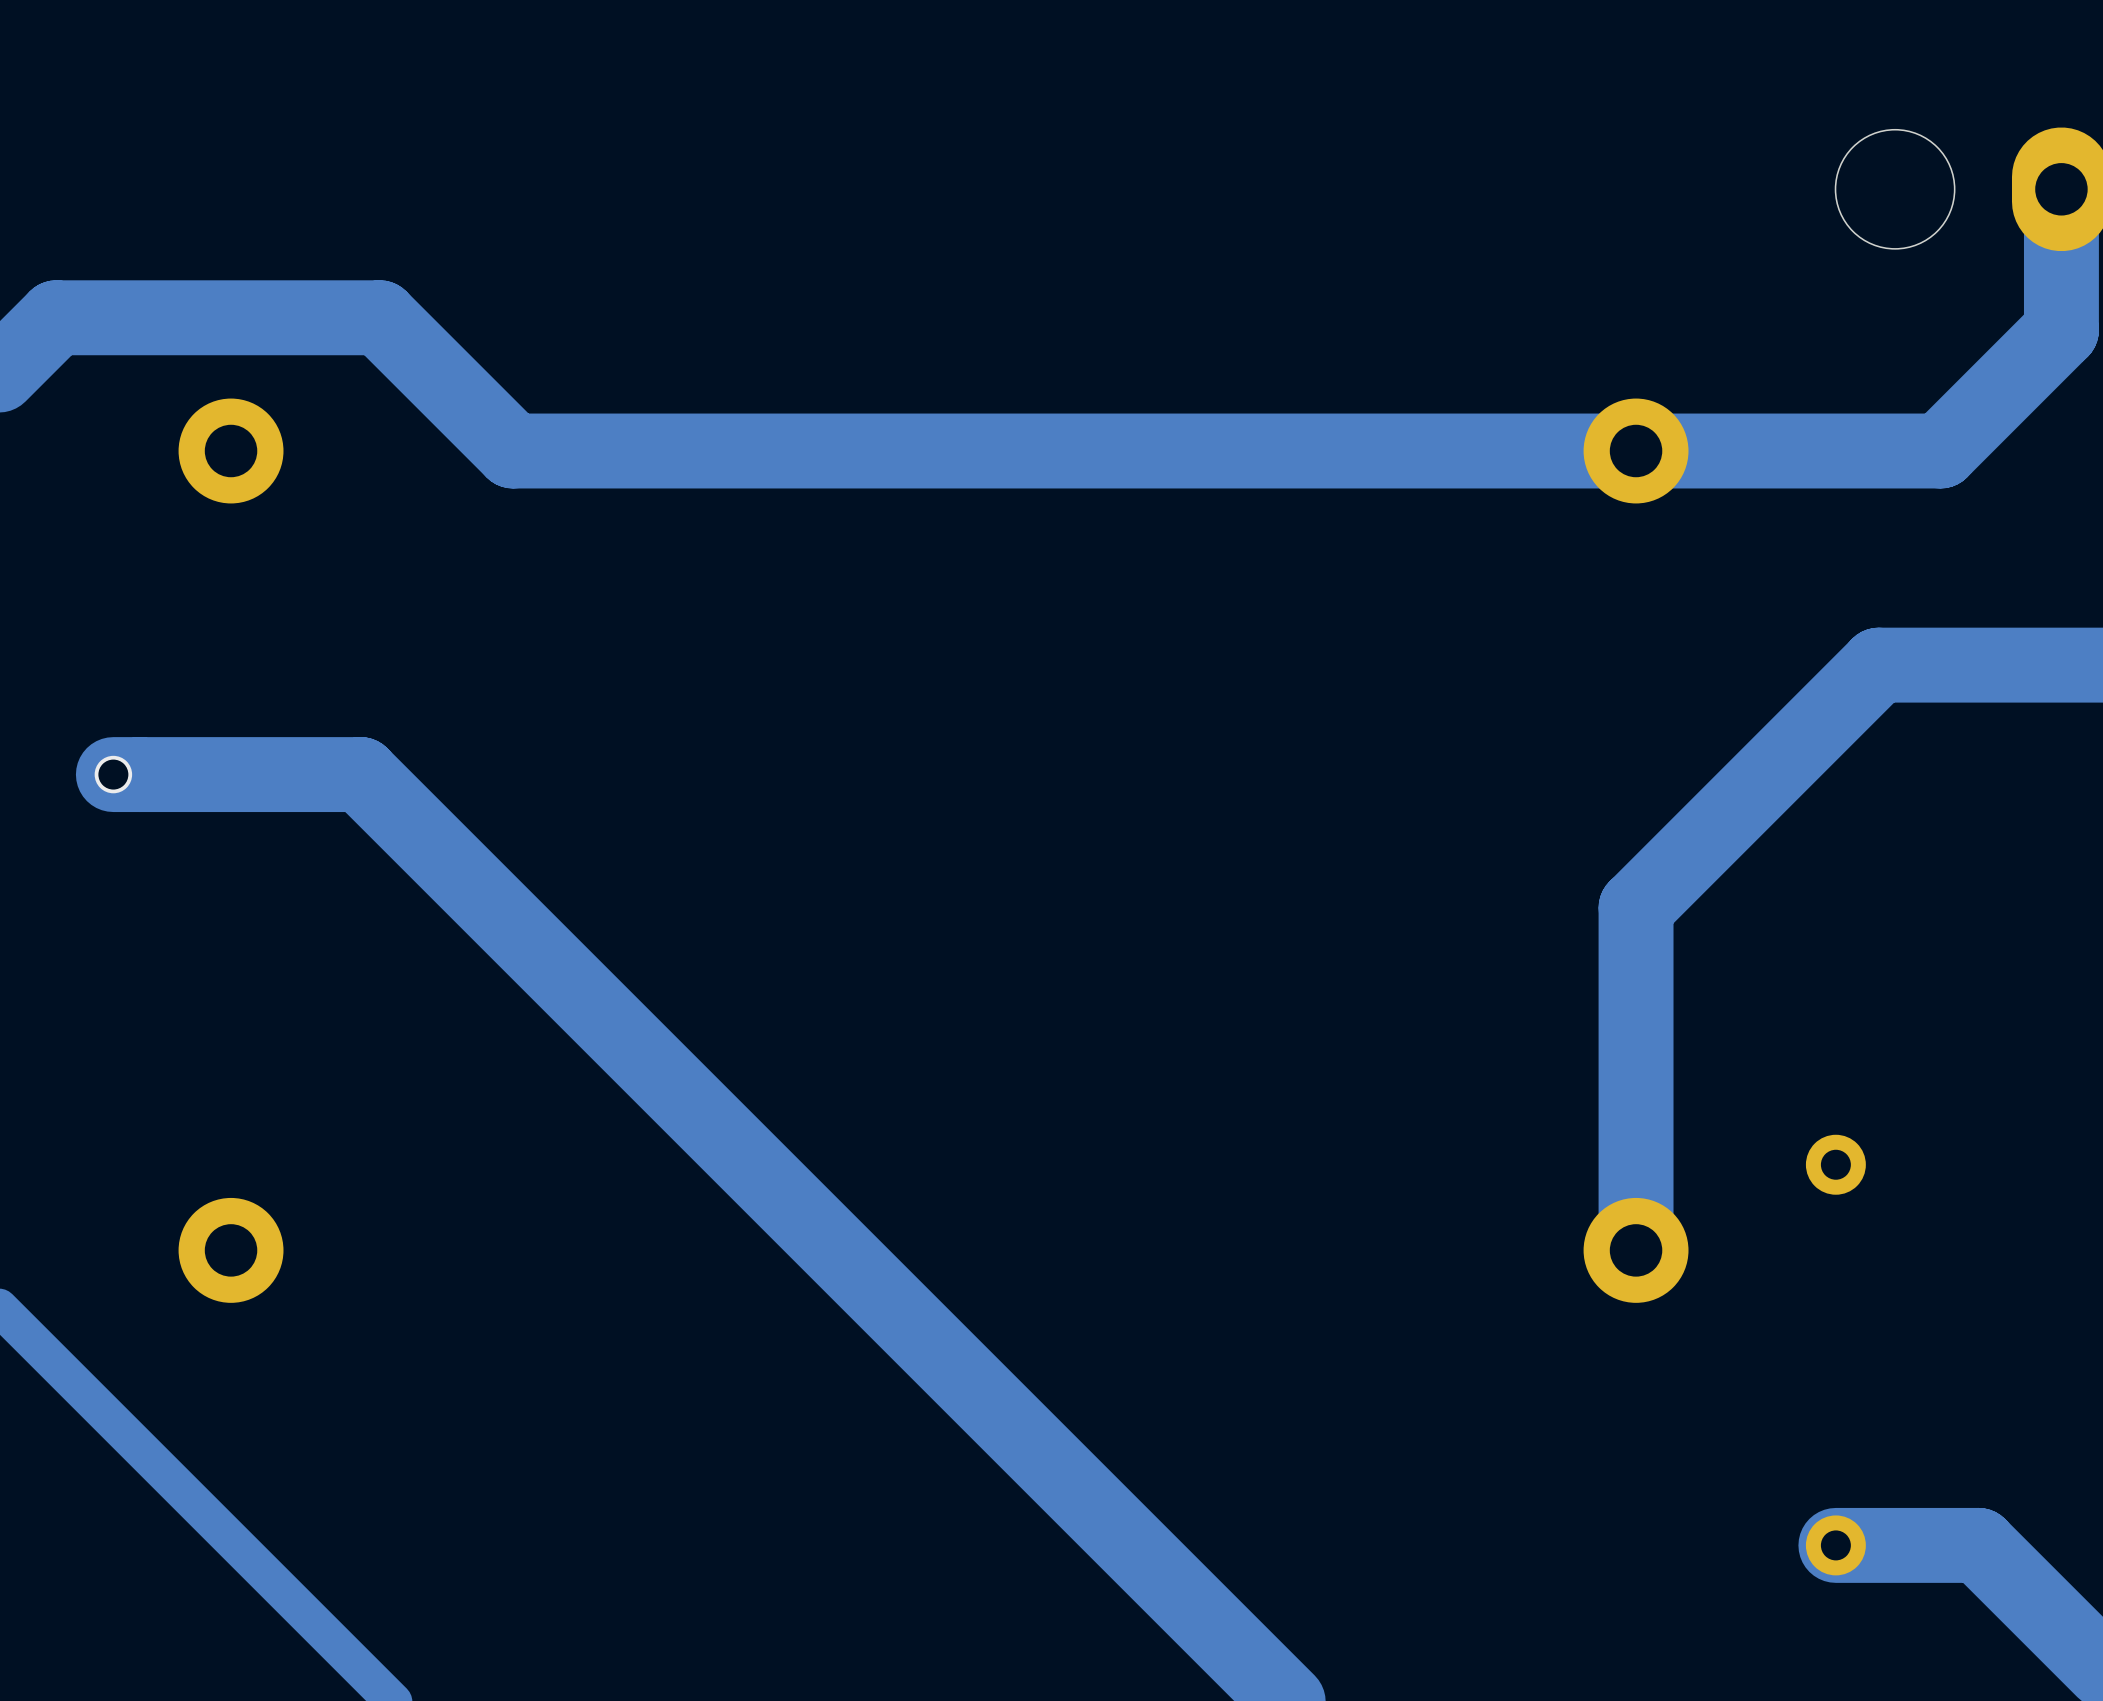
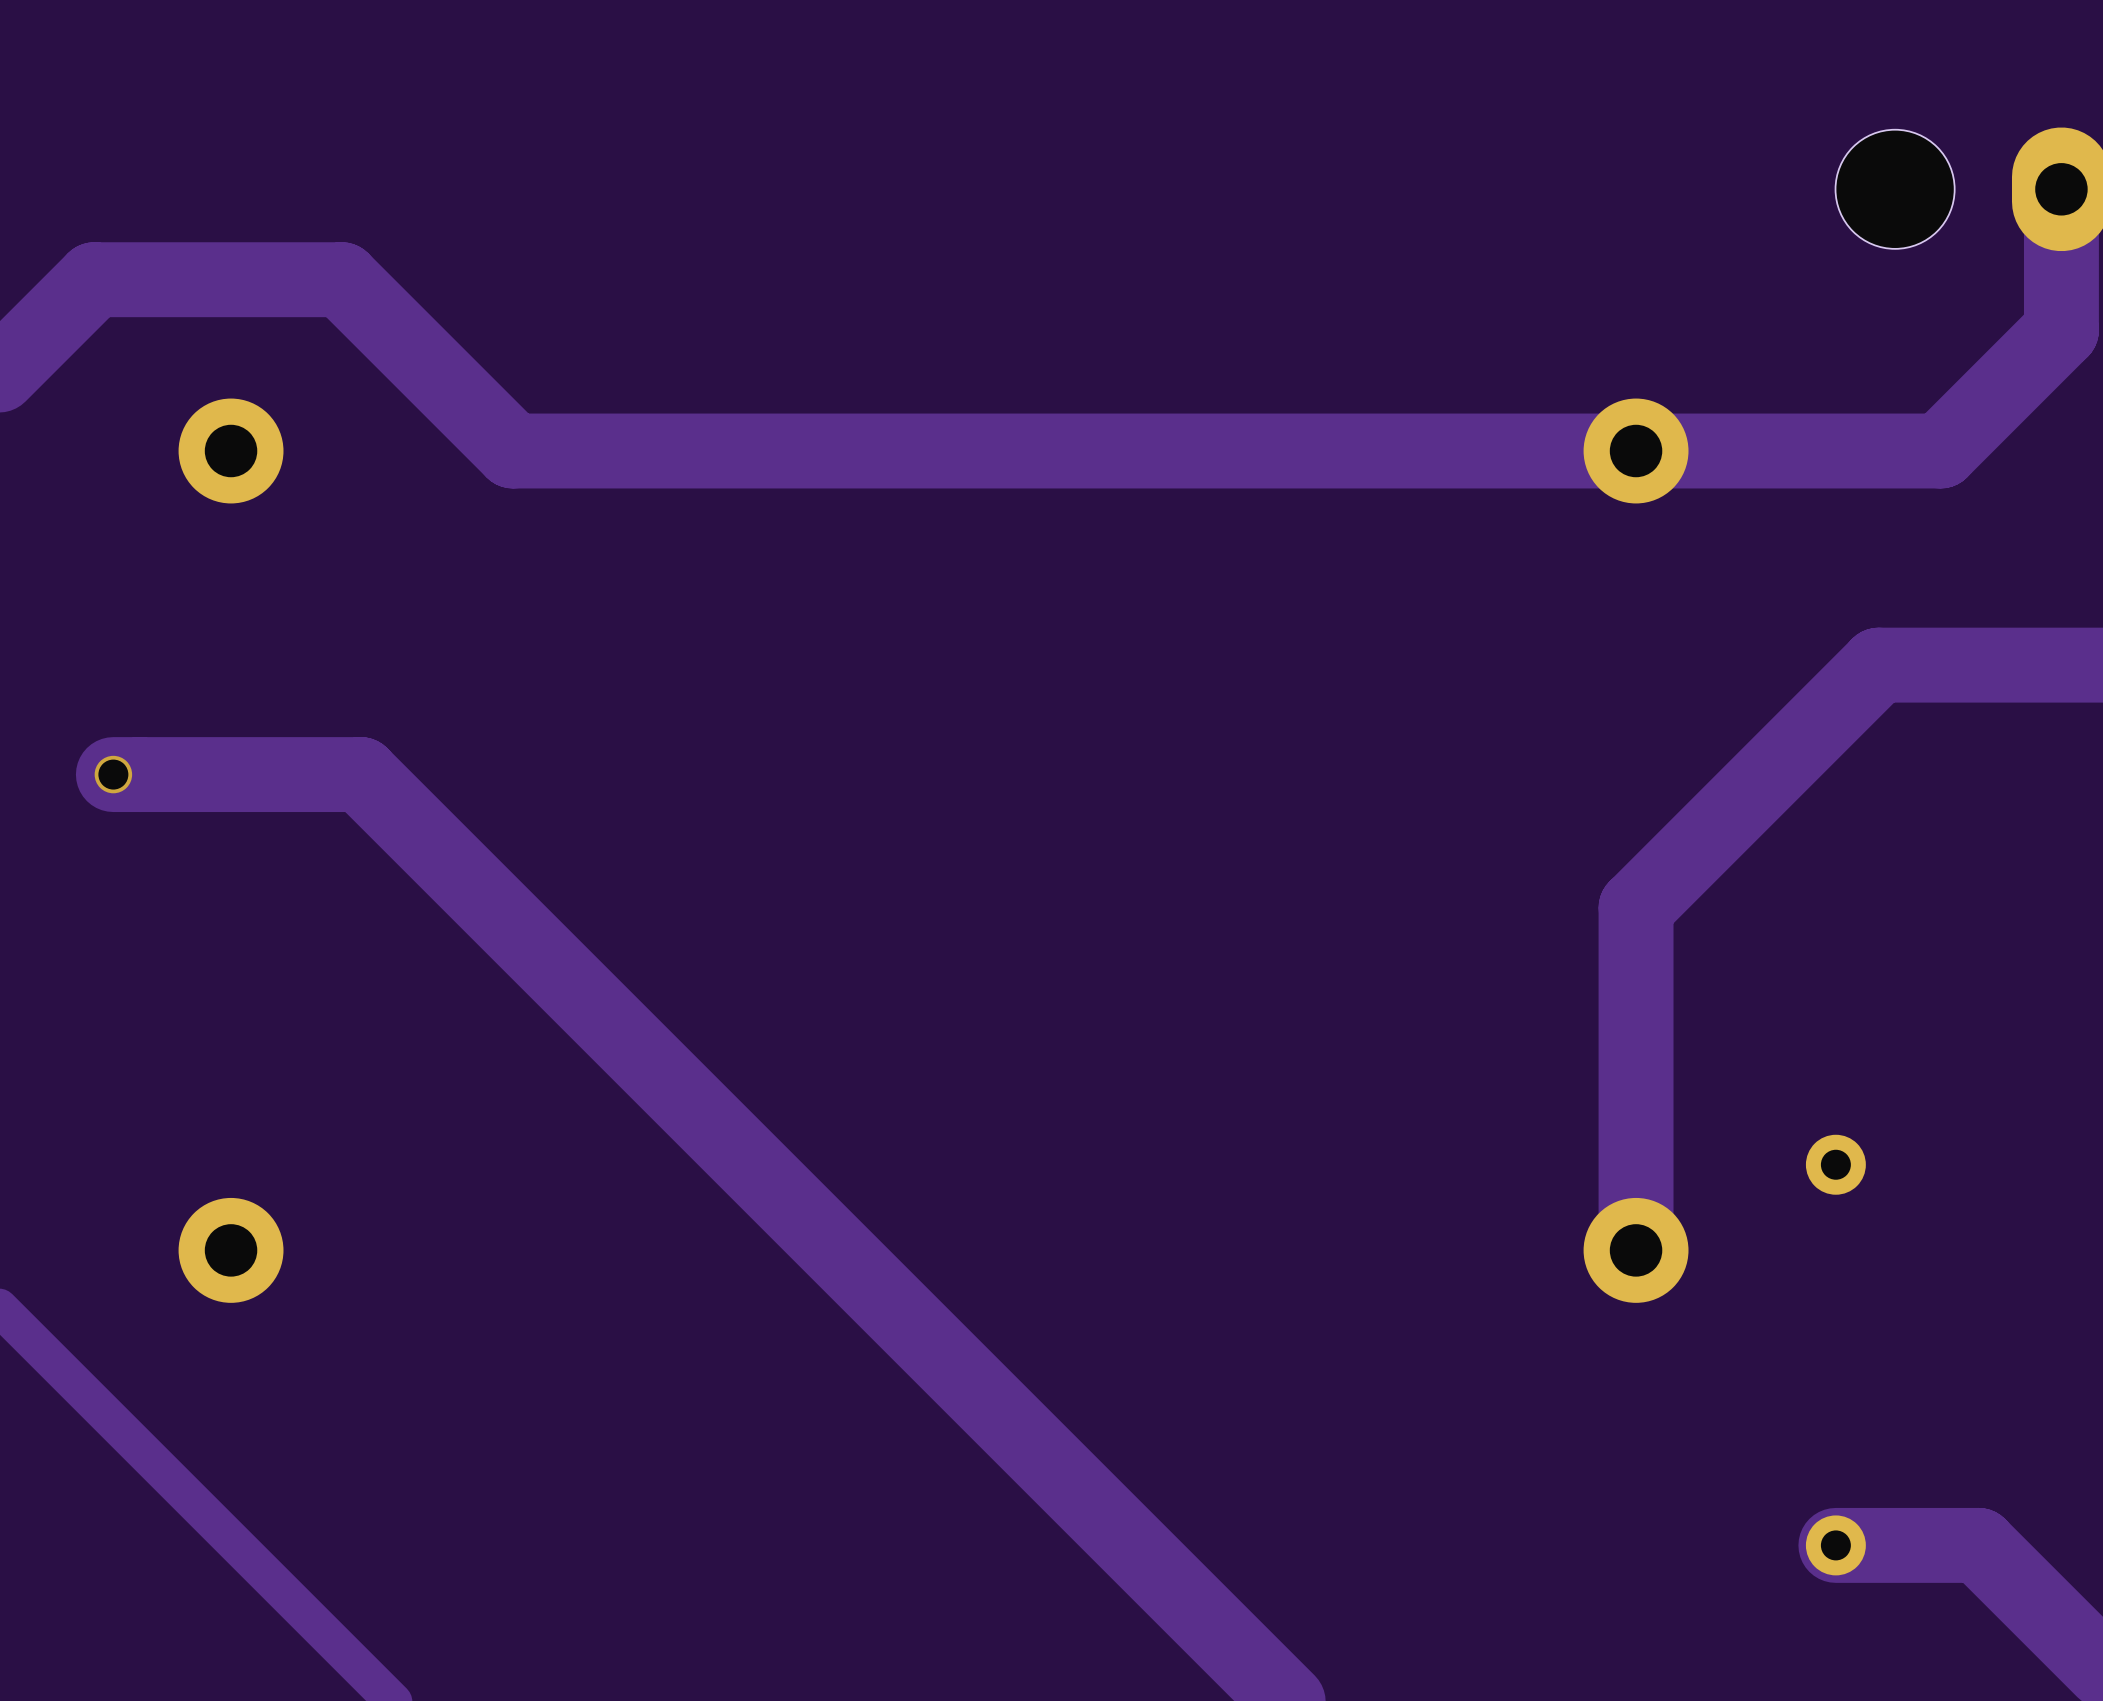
track: (379, 317) (56, 317) -> (379, 317) (341, 279) (94, 279) (56, 317)

